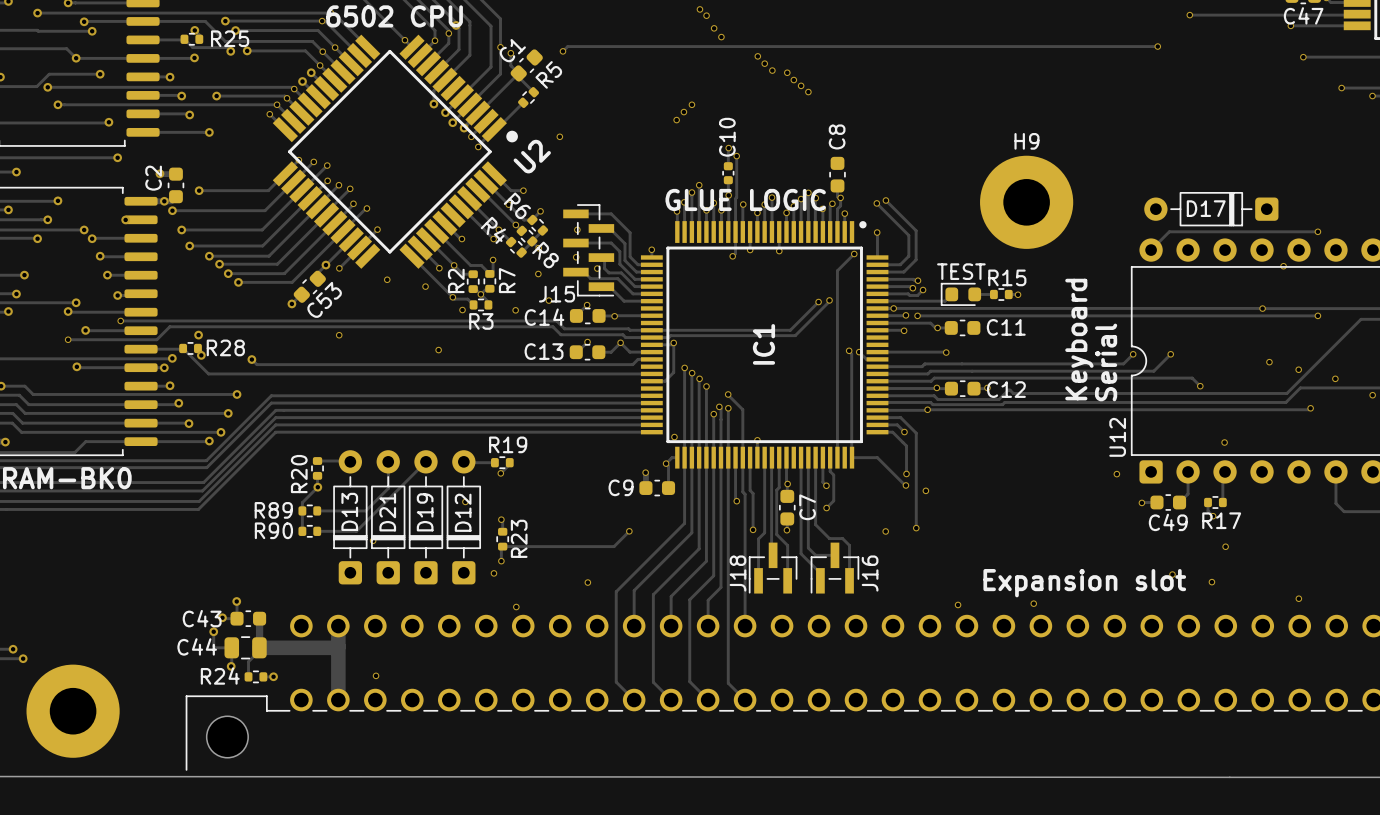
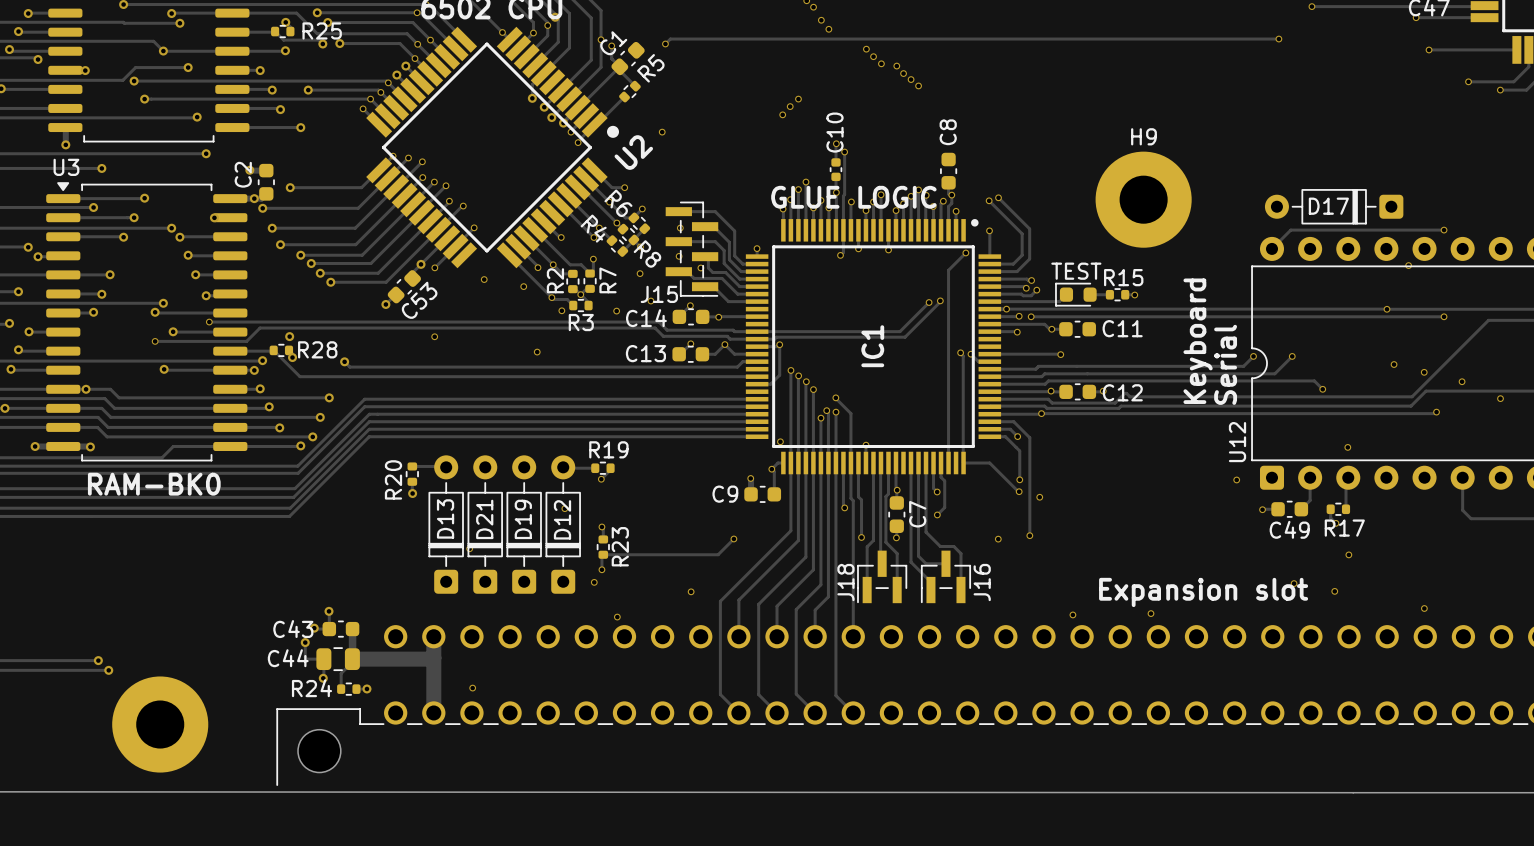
track: (425, 461) (356, 531) (317, 531) -> none
track: (388, 462) (388, 488) (365, 510) (317, 510) -> none
track: (317, 487) (302, 502) (302, 531) -> none
R89: (309, 510) -> none
R90: (309, 531) -> none

